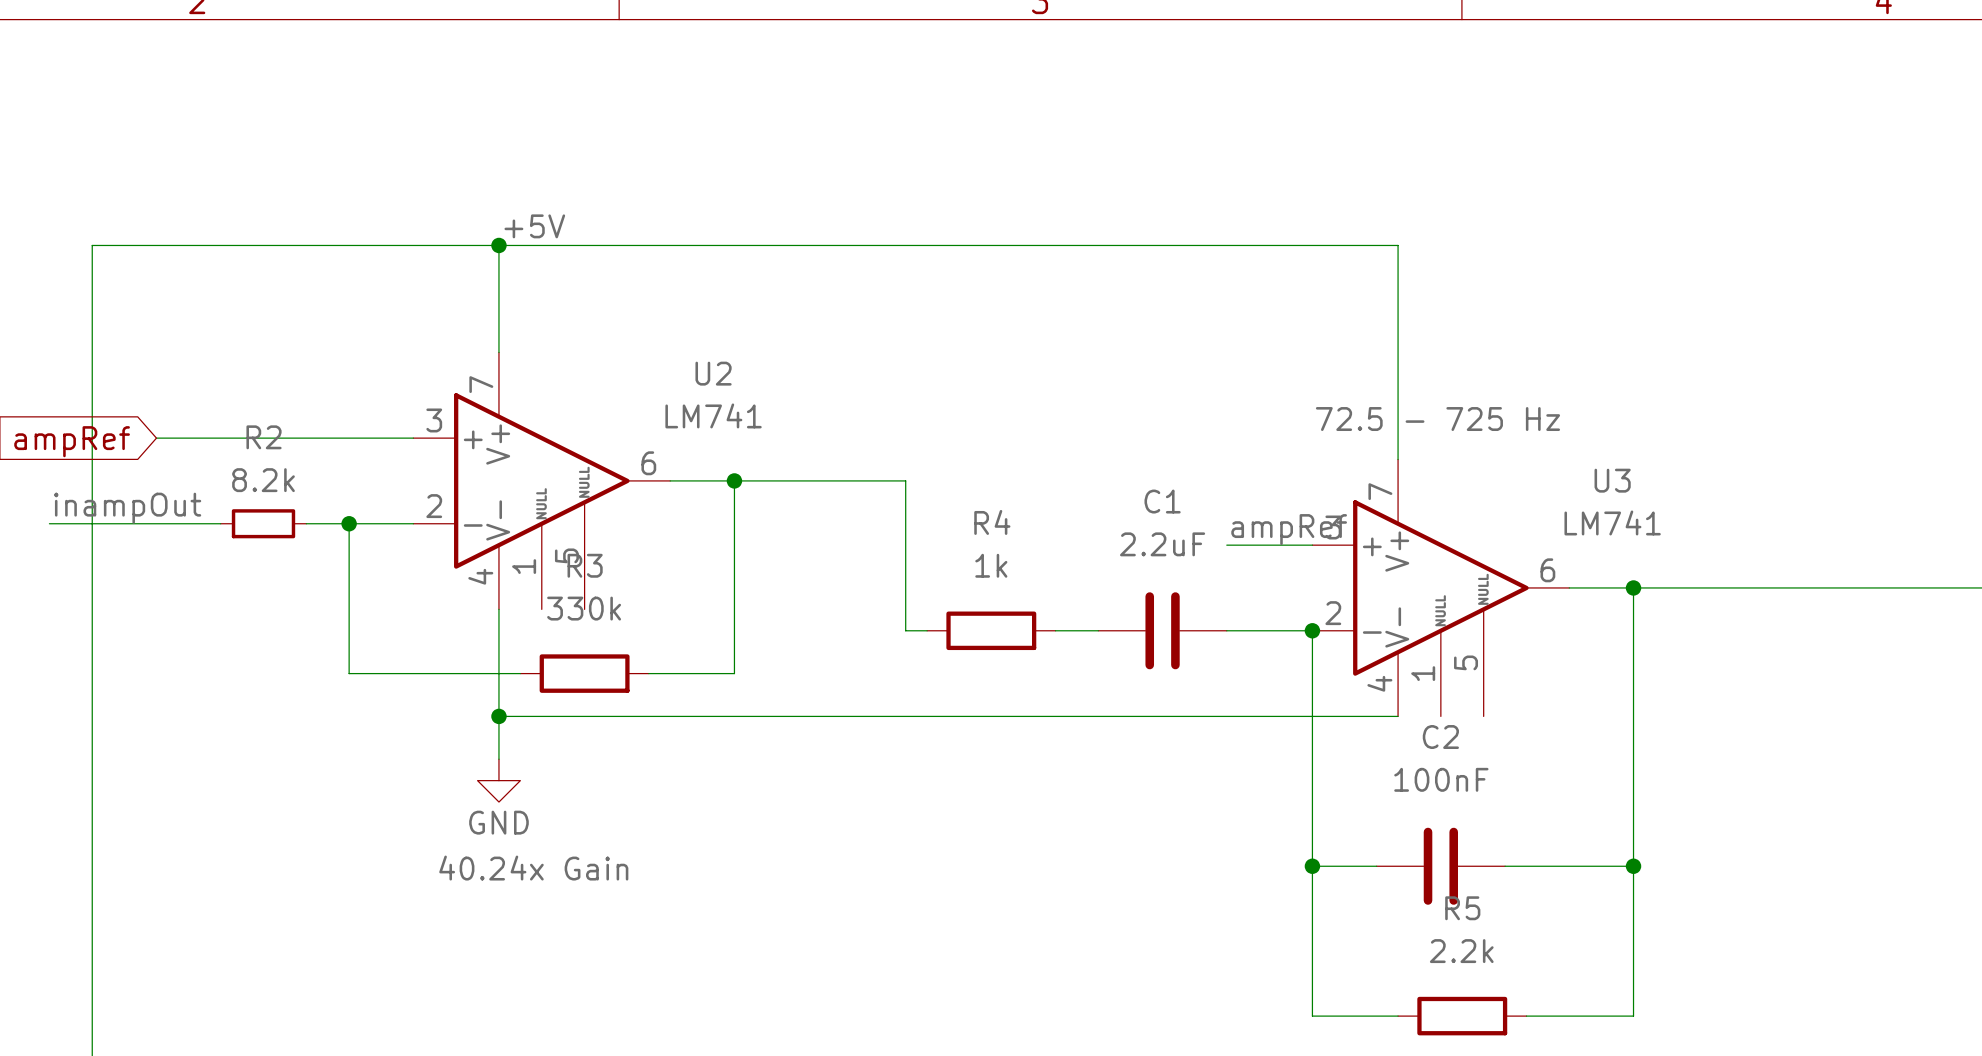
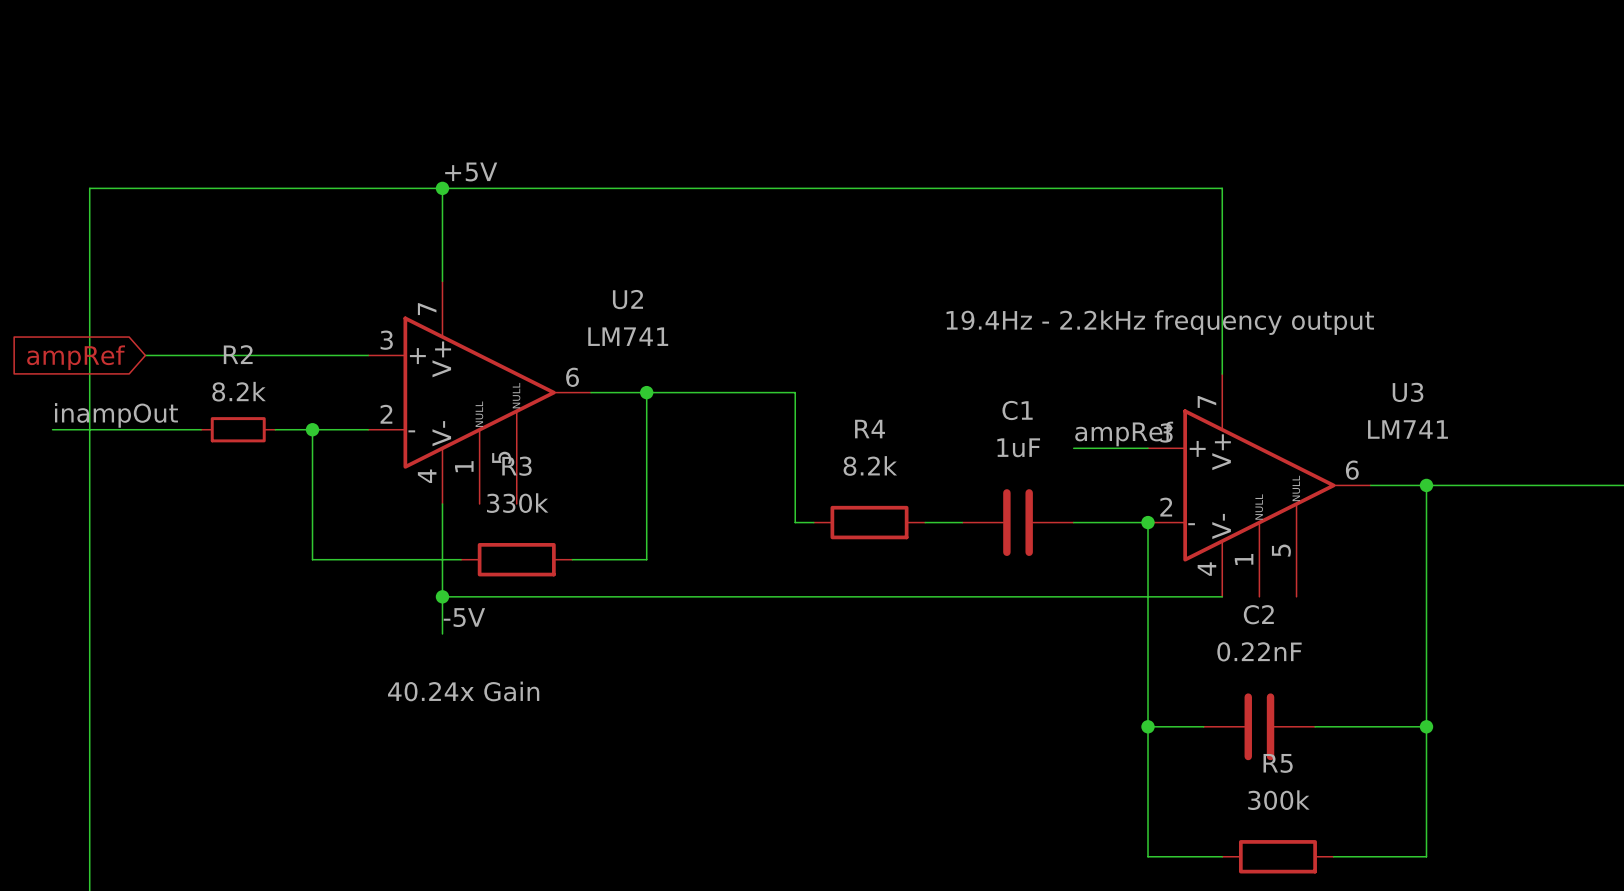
label: none -> 19.4Hz - 2.2kHz frequency output (1160, 322)
label: 72.5 - 725 Hz (1437, 419) -> none
C1 value: 2.2uF (1162, 544) -> 1uF (1018, 447)
R4 value: 1k (991, 565) -> 8.2k (870, 465)
label: none -> -5V (464, 617)
C2 value: 100nF (1441, 779) -> 0.22nF (1259, 651)
power symbol: GND (498, 780) -> none
label position: 40.24x Gain (533, 868) -> 40.24x Gain (463, 691)
R5 value: 2.2k (1461, 951) -> 300k (1278, 800)

